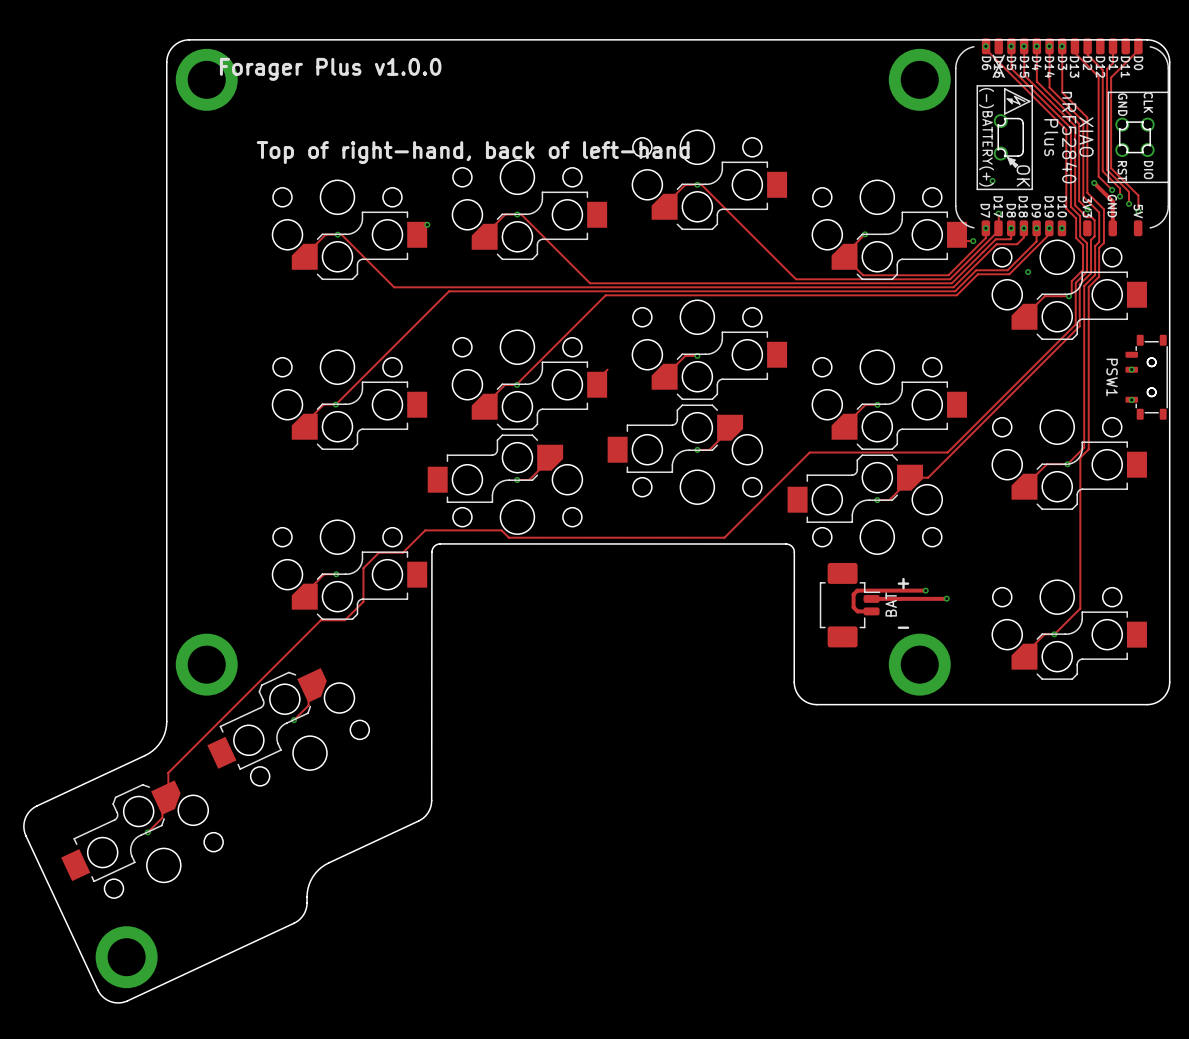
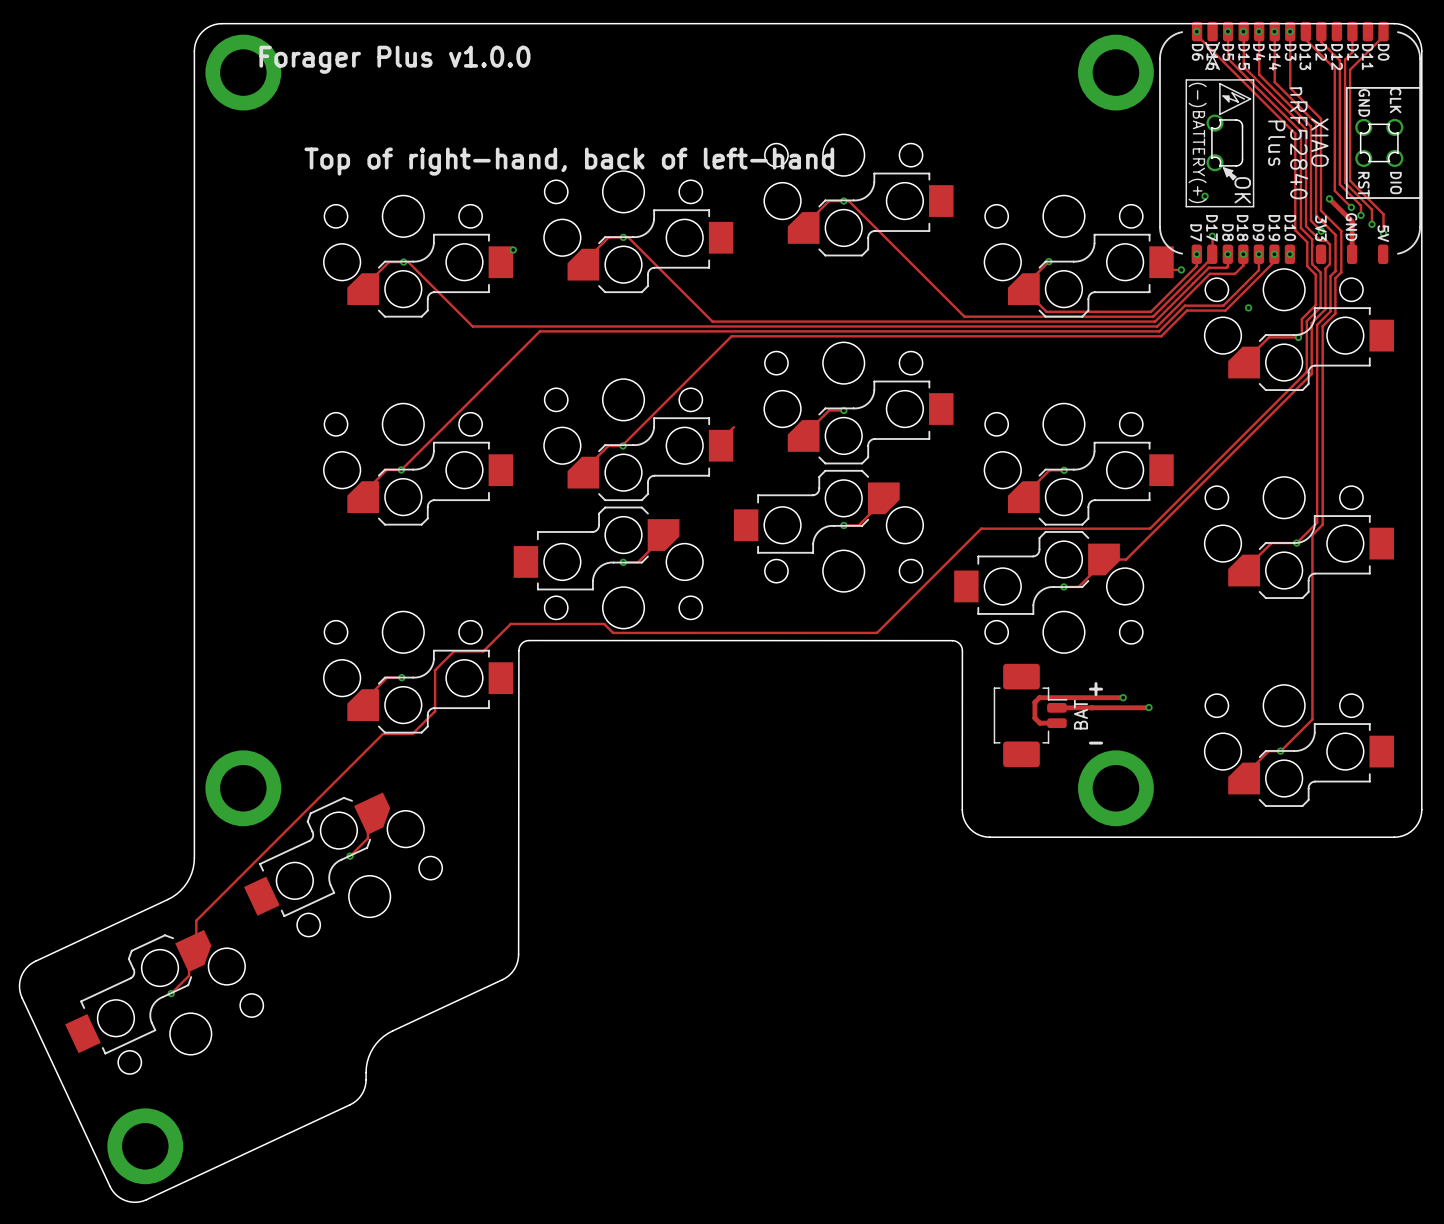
via: (1131, 369) -> none
PSW1: (1146, 377) -> none
part: (1151, 377) -> none
via: (1131, 399) -> none

